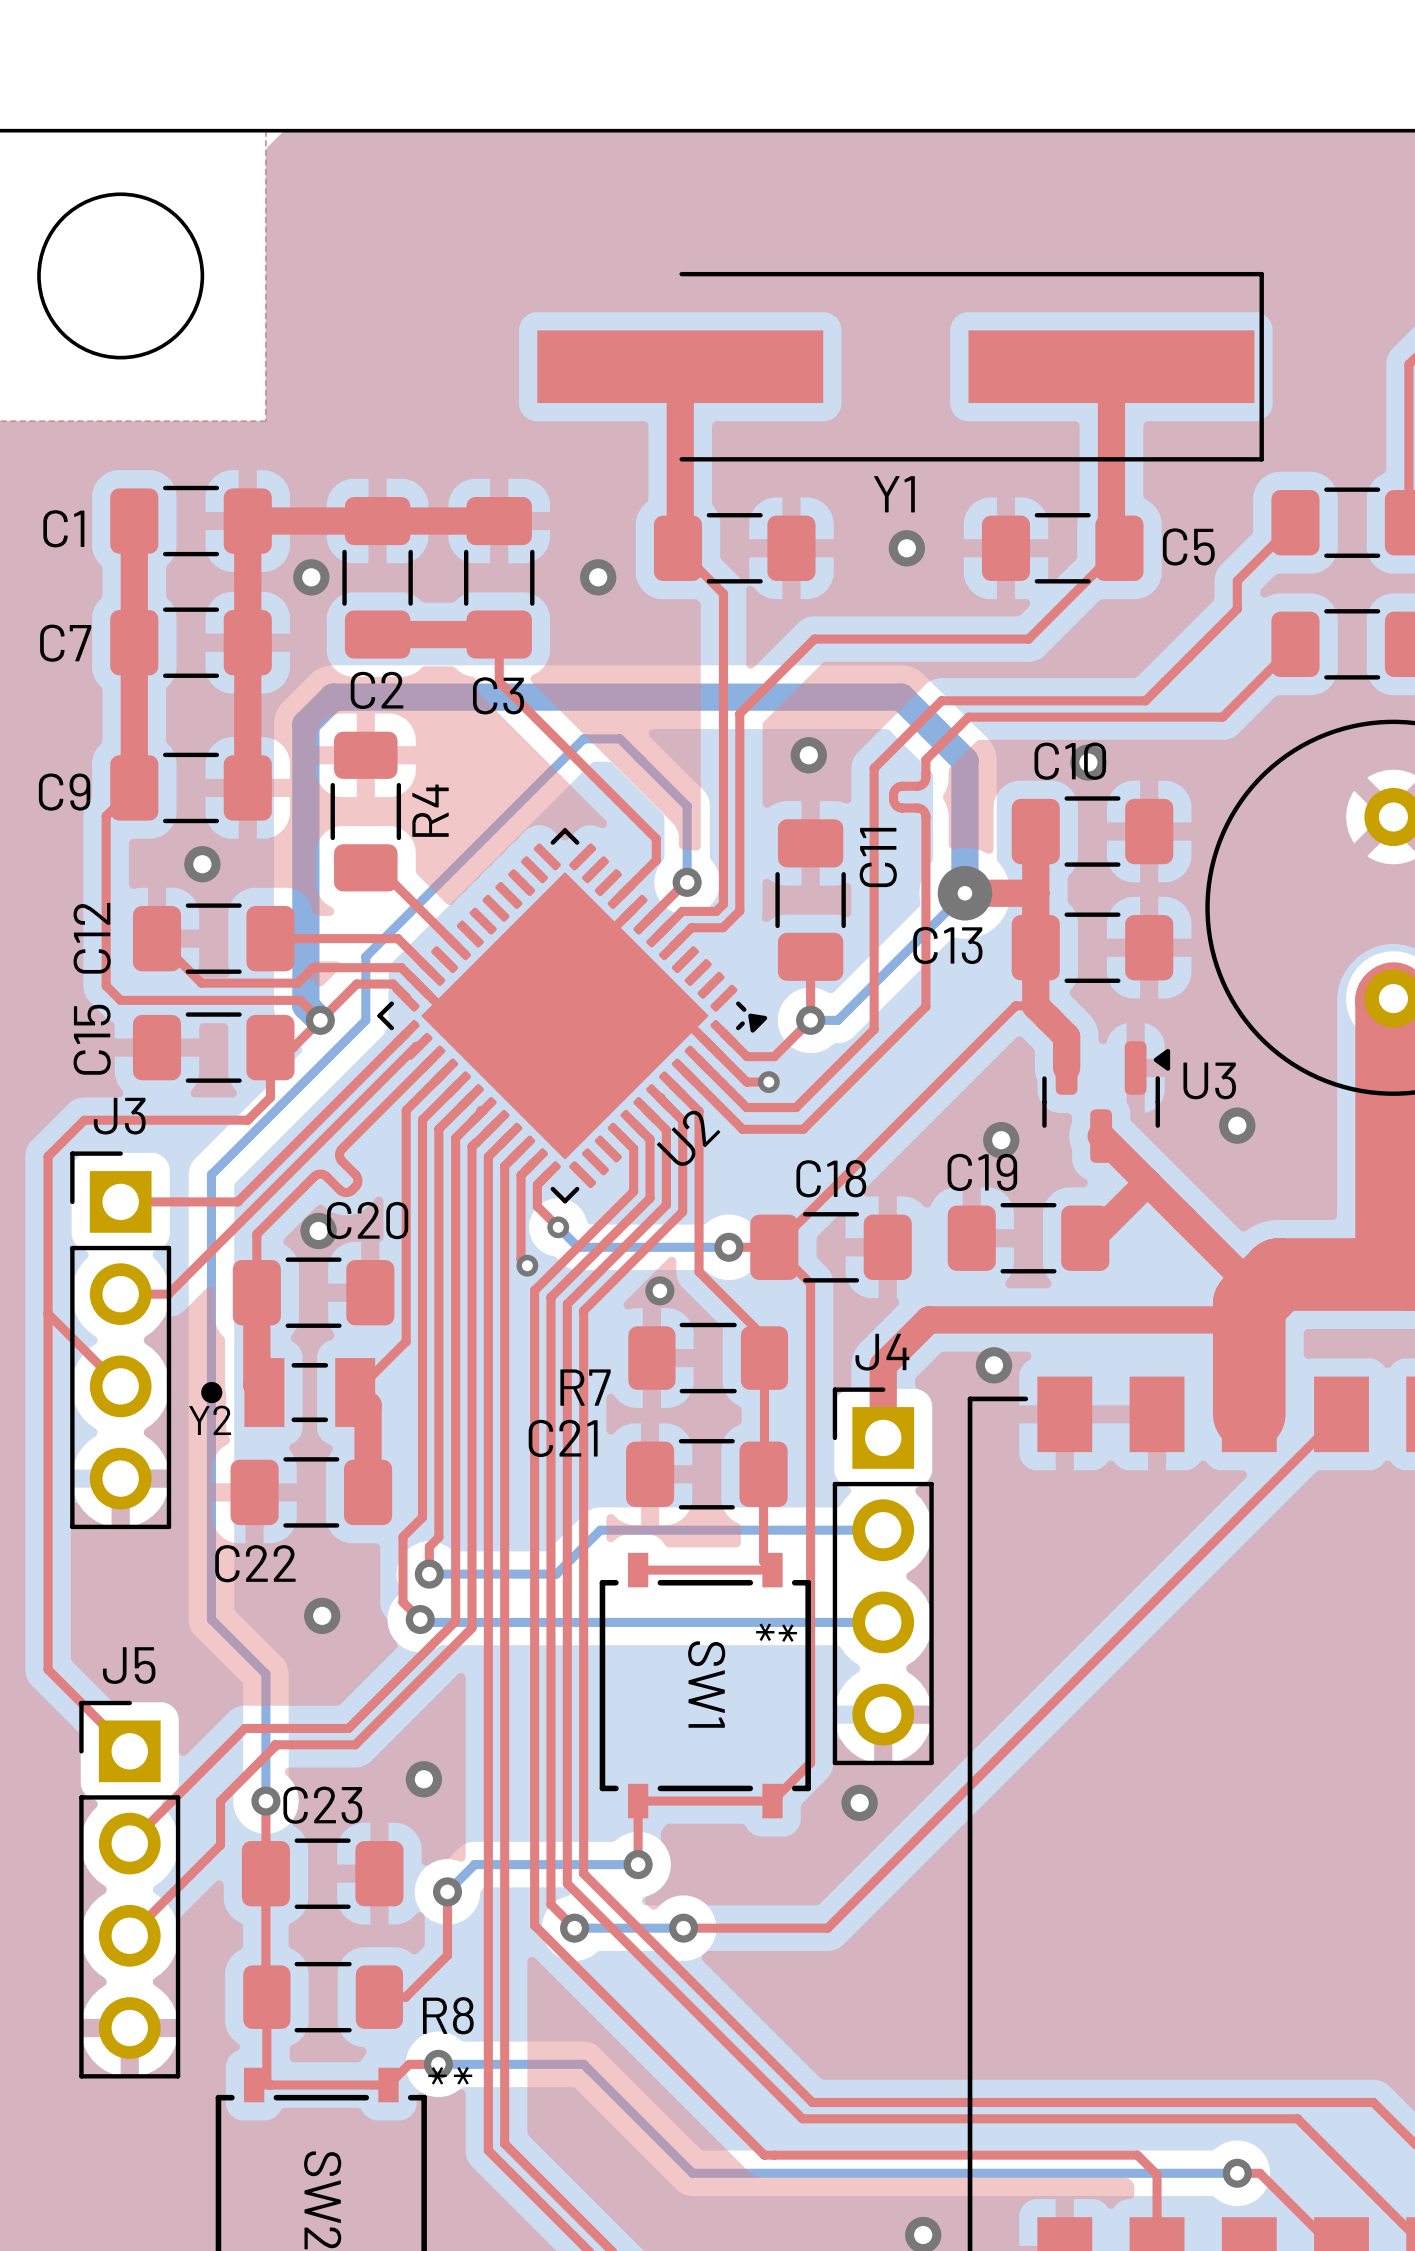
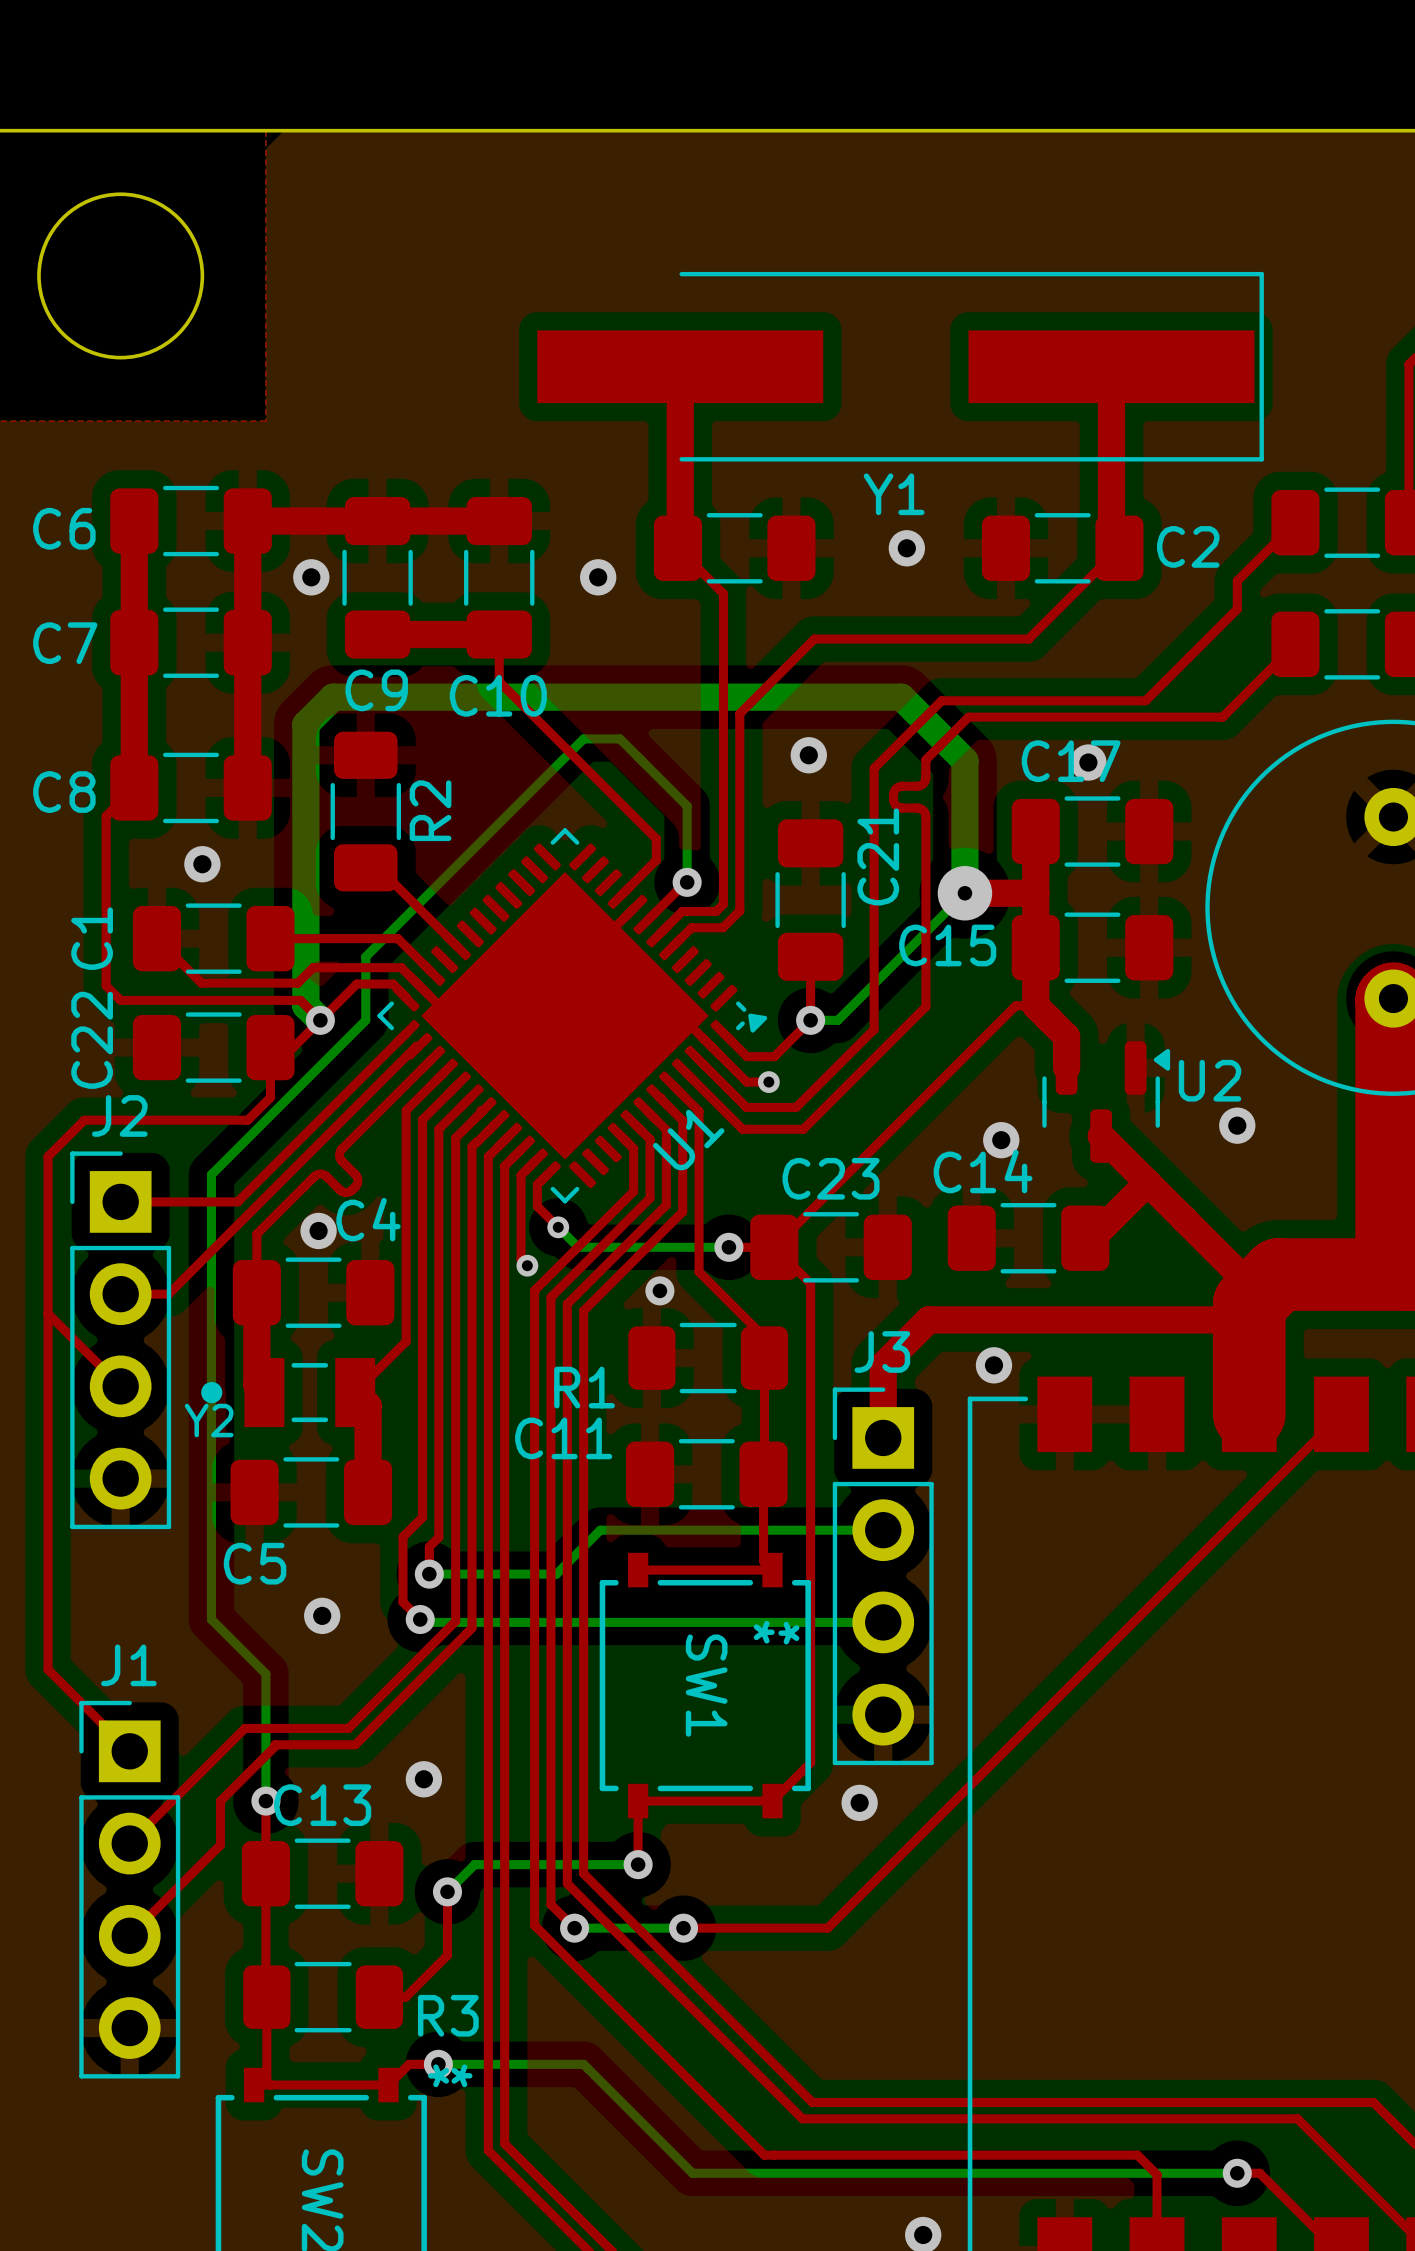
C1 name: C1 (63, 528) -> C6 (64, 528)
C5 name: C5 (1188, 546) -> C2 (1188, 546)
C2 name: C2 (377, 690) -> C9 (376, 690)
C3 name: C3 (498, 695) -> C10 (498, 695)
C10 name: C10 (1070, 761) -> C17 (1071, 761)
C9 name: C9 (64, 792) -> C8 (64, 792)
R4 name: R4 (430, 810) -> R2 (430, 810)
C11 name: C11 (878, 857) -> C21 (878, 856)
C12 name: C12 (92, 938) -> C1 (92, 938)
C13 name: C13 (947, 945) -> C15 (947, 945)
C15 name: C15 (92, 1039) -> C22 (92, 1040)
U3 name: U3 (1209, 1080) -> U2 (1210, 1080)
J3 name: J3 (119, 1116) -> J2 (119, 1115)
U2 name: U2 (688, 1138) -> U1 (688, 1140)
C19 name: C19 (982, 1172) -> C14 (983, 1171)
C18 name: C18 (831, 1178) -> C23 (831, 1178)
C20 name: C20 (367, 1220) -> C4 (368, 1219)
J4 name: J4 (882, 1352) -> J3 (882, 1351)
R7 name: R7 (585, 1387) -> R1 (584, 1387)
C21 name: C21 (563, 1438) -> C11 (563, 1438)
C22 name: C22 (255, 1563) -> C5 (255, 1563)
J5 name: J5 (129, 1665) -> J1 (128, 1665)
C23 name: C23 (322, 1805) -> C13 (322, 1805)
R8 name: R8 (448, 2015) -> R3 (448, 2015)

